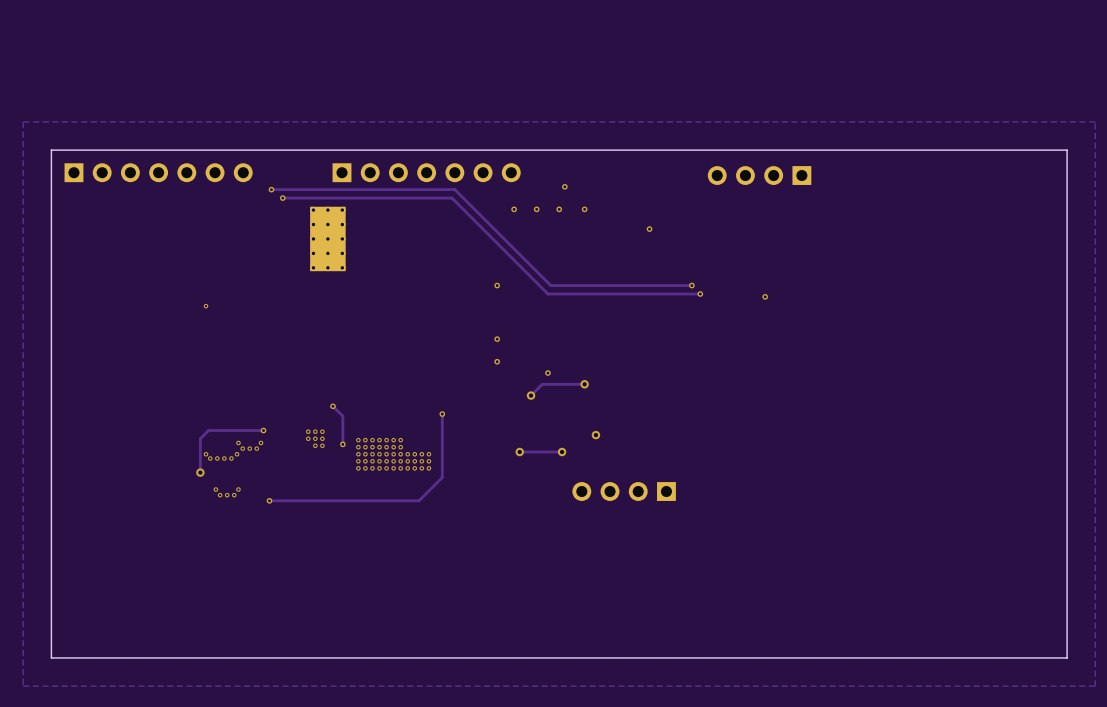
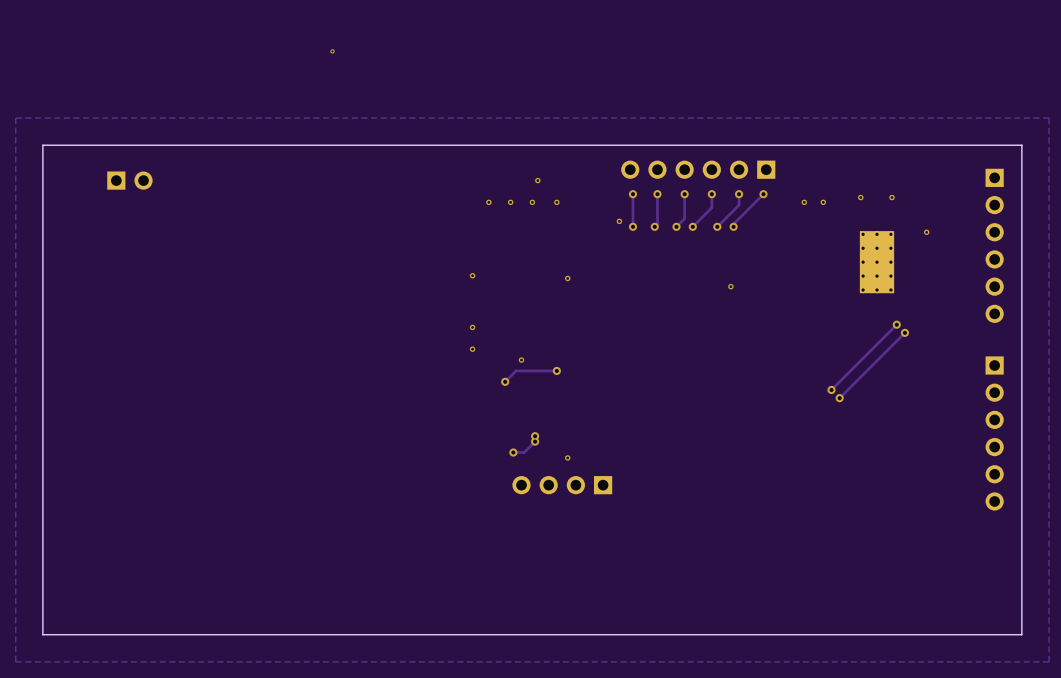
via: none -> (332, 51)
part: (158, 172) -> none
part: (426, 172) -> none
part: none -> (698, 169)
part: none -> (129, 180)
track: (271, 189) (454, 189) (550, 285) (691, 285) -> none
via: (271, 189) -> none
track: (282, 198) (452, 198) (547, 294) (700, 294) -> none
via: (282, 198) -> none
track: none -> (632, 194) (632, 226)
via: none -> (632, 194)
track: none -> (657, 194) (657, 224) (654, 226)
via: none -> (657, 194)
track: none -> (684, 194) (684, 218) (676, 226)
via: none -> (684, 194)
track: none -> (711, 194) (711, 207) (692, 226)
via: none -> (711, 194)
track: none -> (739, 194) (739, 205) (717, 226)
via: none -> (739, 194)
track: none -> (763, 194) (733, 224) (733, 226)
via: none -> (763, 194)
via: none -> (860, 197)
via: none -> (891, 197)
via: none -> (804, 202)
via: none -> (823, 202)
via: none -> (632, 226)
via: none -> (654, 226)
via: none -> (676, 226)
via: none -> (692, 226)
via: none -> (717, 226)
via: none -> (733, 226)
part: (327, 238) -> none
via: none -> (926, 232)
part: none -> (994, 245)
part: none -> (877, 262)
via: (691, 285) -> none
via: none -> (567, 278)
via: (700, 294) -> none
via: (206, 306) -> none
track: none -> (896, 324) (831, 389)
via: none -> (896, 324)
track: none -> (904, 332) (839, 398) (839, 400)
via: none -> (904, 332)
via: none -> (831, 389)
track: (332, 406) (342, 416) (342, 444) -> none
via: (332, 406) -> none
via: none -> (839, 398)
track: (442, 414) (442, 477) (419, 500) (269, 500) -> none
via: (442, 414) -> none
track: (263, 430) (208, 430) (200, 438) (200, 472) -> none
via: (263, 430) -> none
via: (308, 431) -> none
via: (315, 431) -> none
via: (322, 431) -> none
via: (595, 435) -> none
via: (308, 438) -> none
via: (315, 438) -> none
via: (322, 438) -> none
via: (358, 440) -> none
via: (365, 440) -> none
via: (372, 440) -> none
via: (379, 440) -> none
via: (386, 440) -> none
via: (393, 440) -> none
via: (400, 440) -> none
via: (238, 442) -> none
via: (261, 442) -> none
via: (342, 444) -> none
via: (315, 445) -> none
via: (322, 445) -> none
via: (358, 447) -> none
via: (365, 447) -> none
via: (372, 447) -> none
via: (379, 447) -> none
via: (386, 447) -> none
via: (393, 447) -> none
via: (400, 447) -> none
via: (242, 448) -> none
via: (249, 448) -> none
via: (256, 448) -> none
part: none -> (994, 433)
via: (519, 452) -> none
track: (562, 452) (519, 452) -> none
via: (206, 454) -> none
via: (237, 454) -> none
via: (358, 454) -> none
via: (365, 454) -> none
via: (372, 454) -> none
via: (379, 454) -> none
via: (386, 454) -> none
via: (393, 454) -> none
via: (400, 454) -> none
via: (407, 454) -> none
via: (414, 454) -> none
via: (421, 454) -> none
via: (428, 454) -> none
track: none -> (535, 441) (524, 452) (513, 452)
via: none -> (535, 441)
via: (210, 458) -> none
via: (217, 458) -> none
via: (224, 458) -> none
via: (231, 458) -> none
via: (358, 461) -> none
via: (365, 461) -> none
via: (372, 461) -> none
via: (379, 461) -> none
via: (386, 461) -> none
via: (393, 461) -> none
via: (400, 461) -> none
via: (407, 461) -> none
via: (414, 461) -> none
via: (421, 461) -> none
via: (428, 461) -> none
via: (358, 468) -> none
via: (365, 468) -> none
via: (372, 468) -> none
via: (379, 468) -> none
via: (386, 468) -> none
via: (393, 468) -> none
via: (400, 468) -> none
via: (407, 468) -> none
via: (414, 468) -> none
via: (421, 468) -> none
via: (428, 468) -> none
via: none -> (513, 452)
via: (200, 472) -> none
via: none -> (567, 457)
via: (215, 489) -> none
via: (238, 489) -> none
part position: (624, 491) -> (562, 485)
via: (220, 495) -> none
via: (227, 495) -> none
via: (234, 495) -> none
via: (269, 500) -> none

